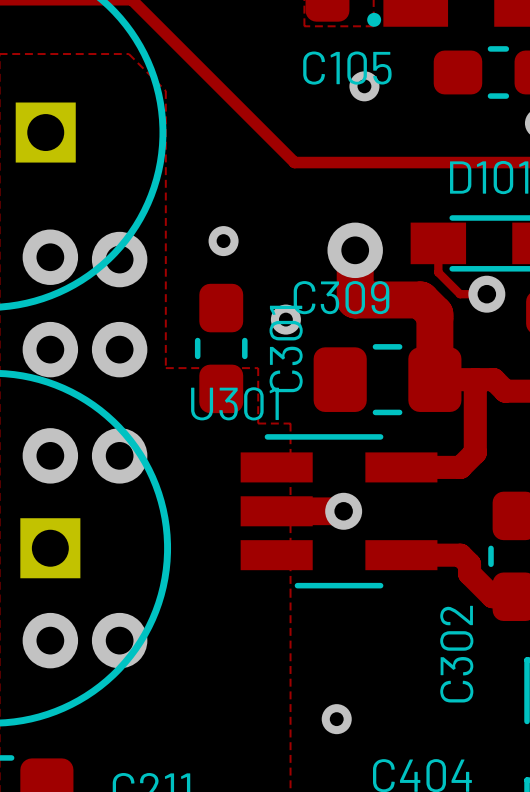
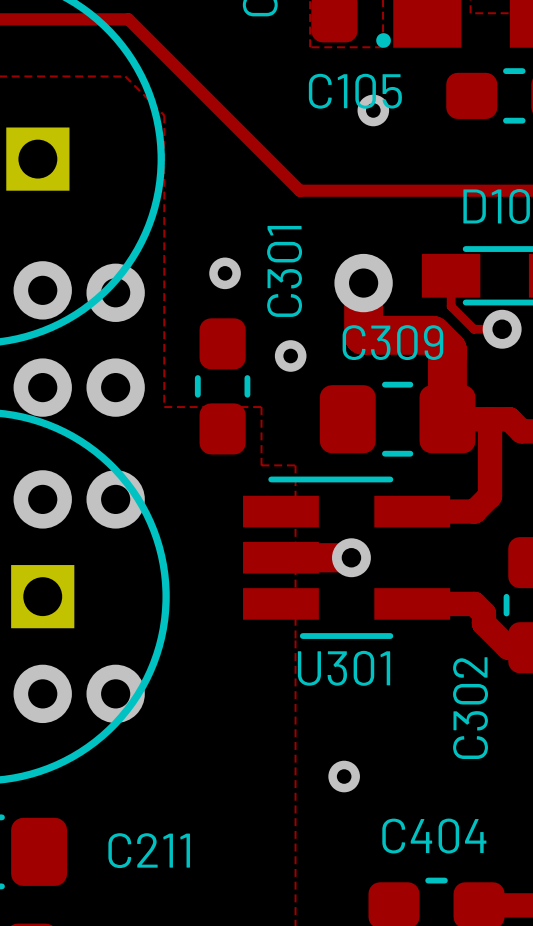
C309 name position: C309 (341, 297) -> C309 (392, 342)
C301 name position: C301 (286, 348) -> C301 (284, 271)
U301 name position: U301 (234, 403) -> U301 (343, 668)

